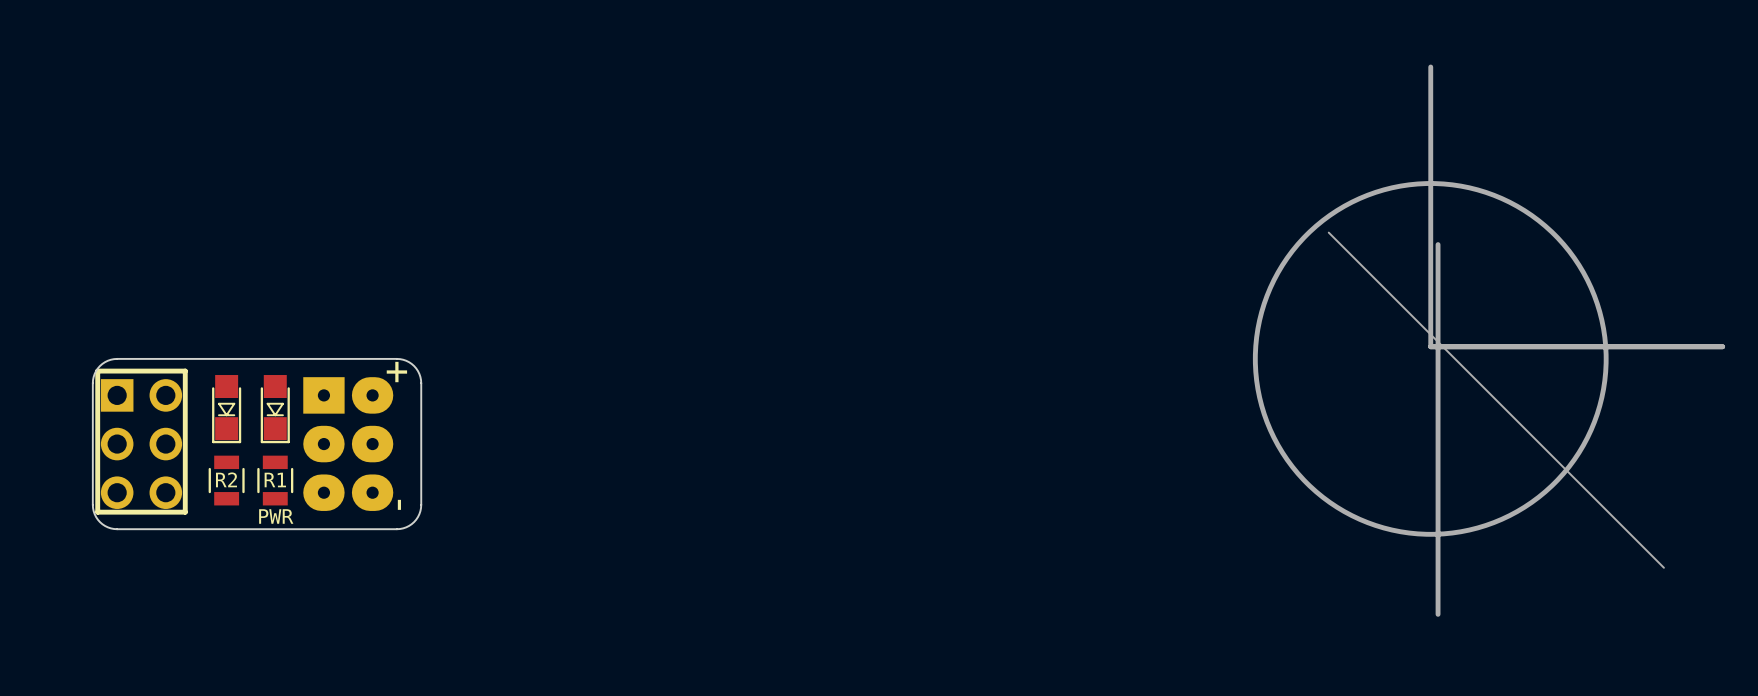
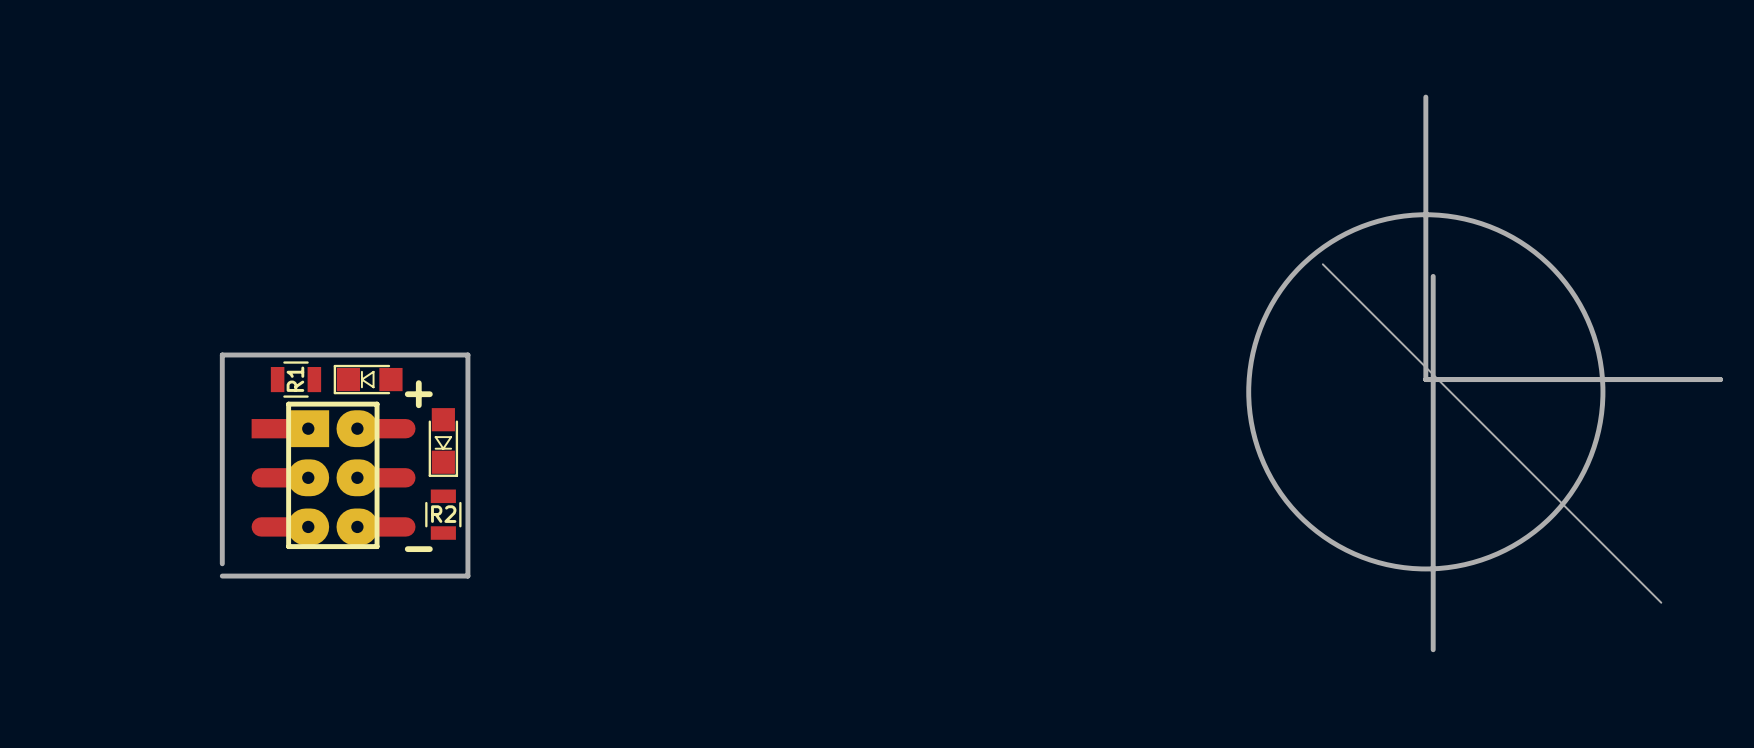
part: none -> (368, 379)
text position: + (396, 372) -> + (418, 394)
part: (226, 409) -> none
part: (275, 409) -> none
part: none -> (443, 442)
part: (141, 441) -> none
part: none -> (333, 475)
R2 position: (226, 480) -> (443, 514)
R1 rotation: 0° (275, 480) -> 90° clockwise (295, 379)
R1 position: (275, 480) -> (295, 379)
board edge: (92, 504) (93, 380) (97, 368) (107, 360) (117, 358) (400, 359) (414, 366) (421, 380) (421, 504) (419, 514) (414, 522) (406, 527) (396, 529) -> none
board edge: (92, 504) (94, 514) (99, 522) (114, 528) (396, 529) -> none
text rotation: 0° (399, 504) -> 90° counterclockwise (418, 549)
text: PWR (276, 516) -> none
line: none -> (222, 563) (222, 355) (467, 355) (467, 576) (222, 576)

